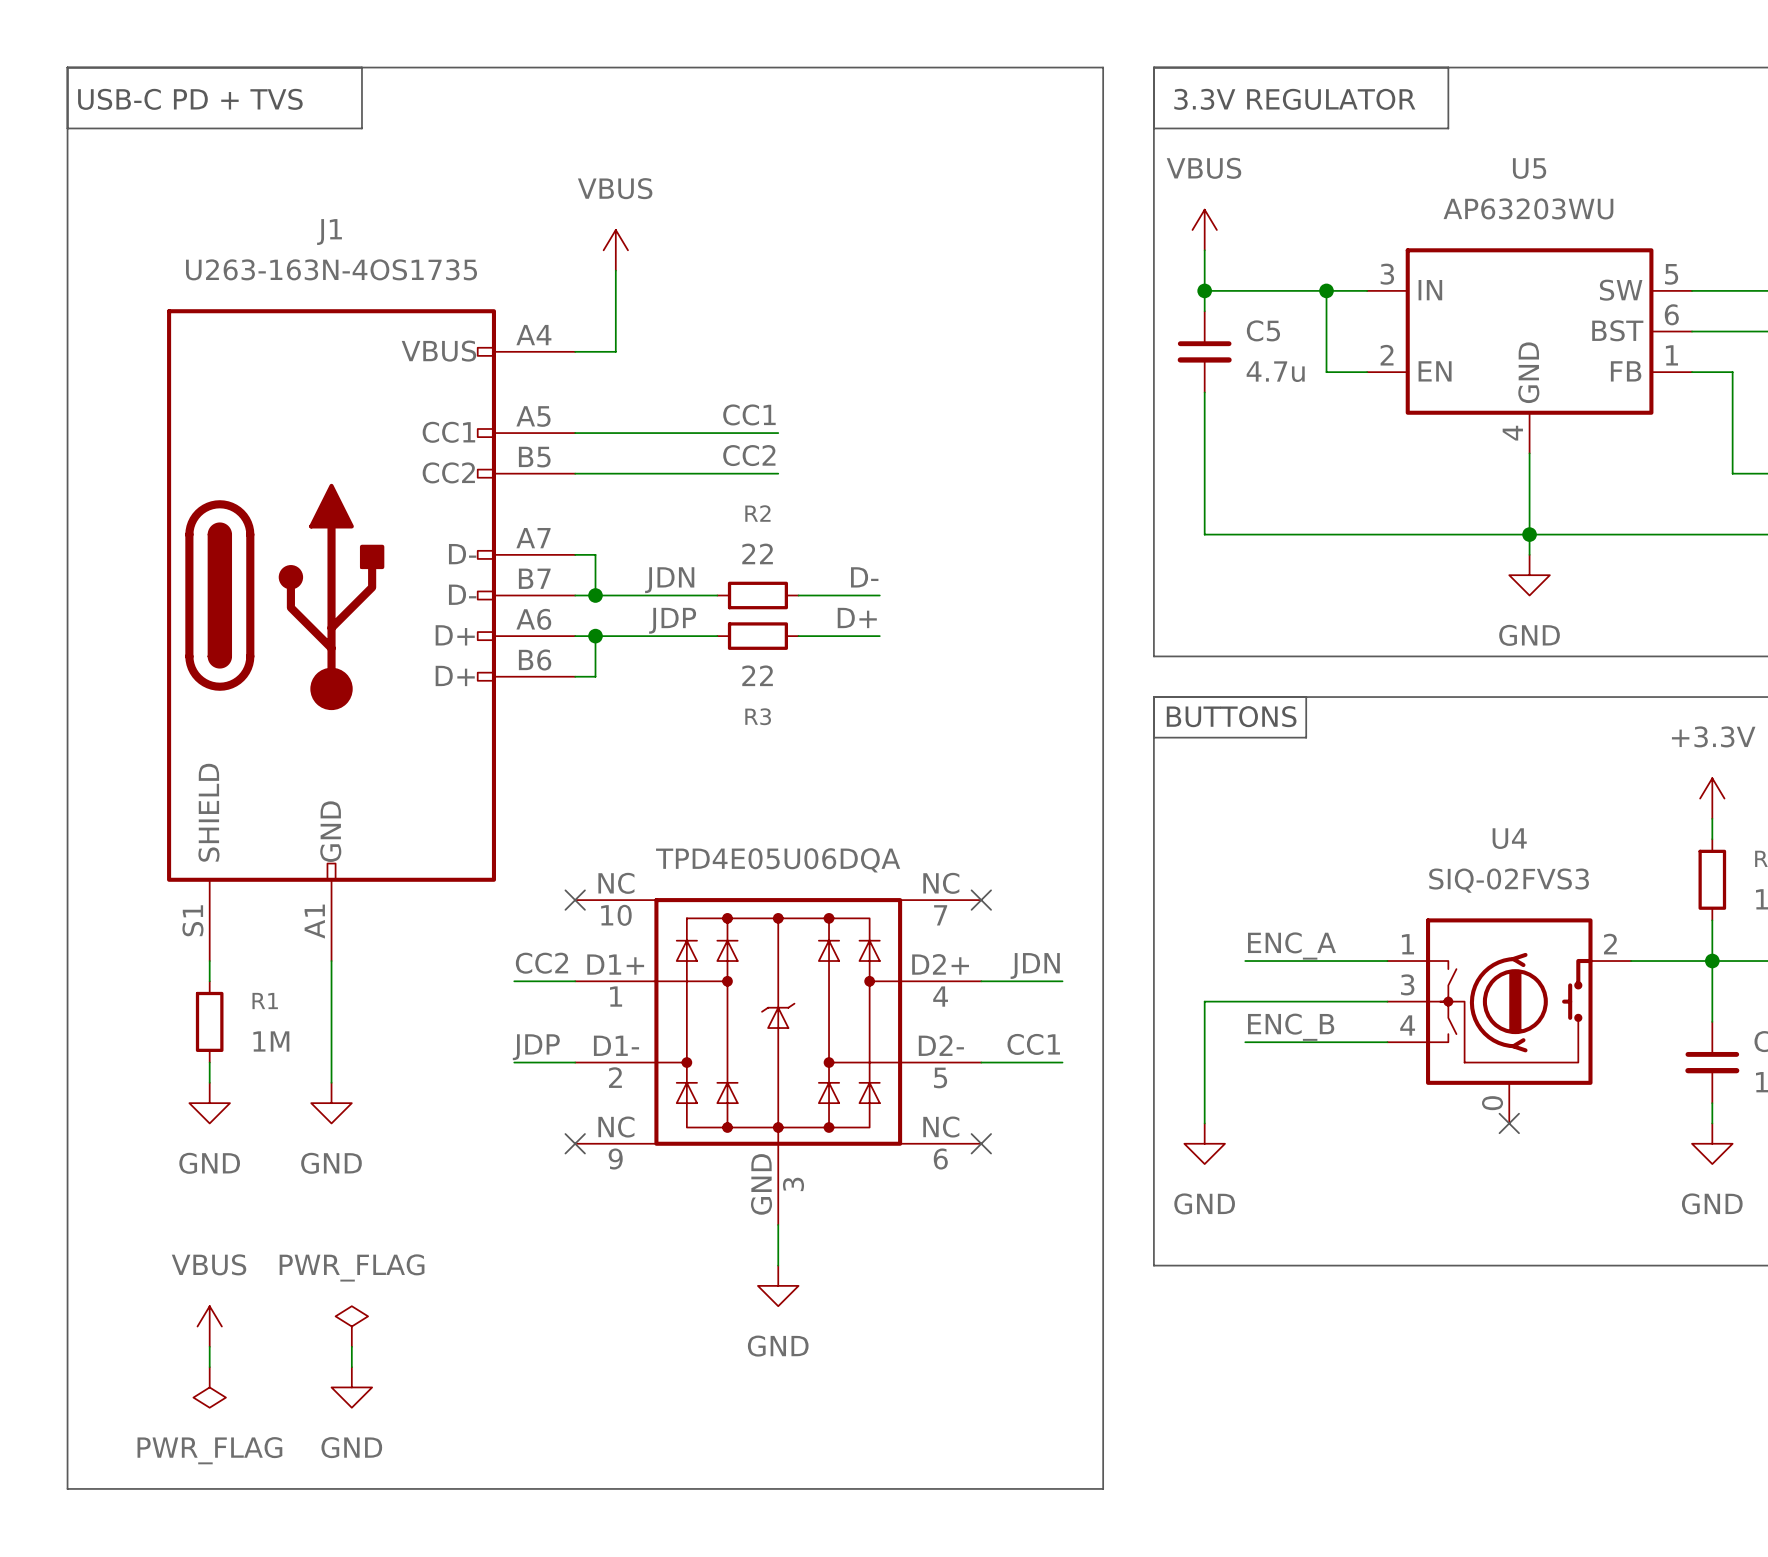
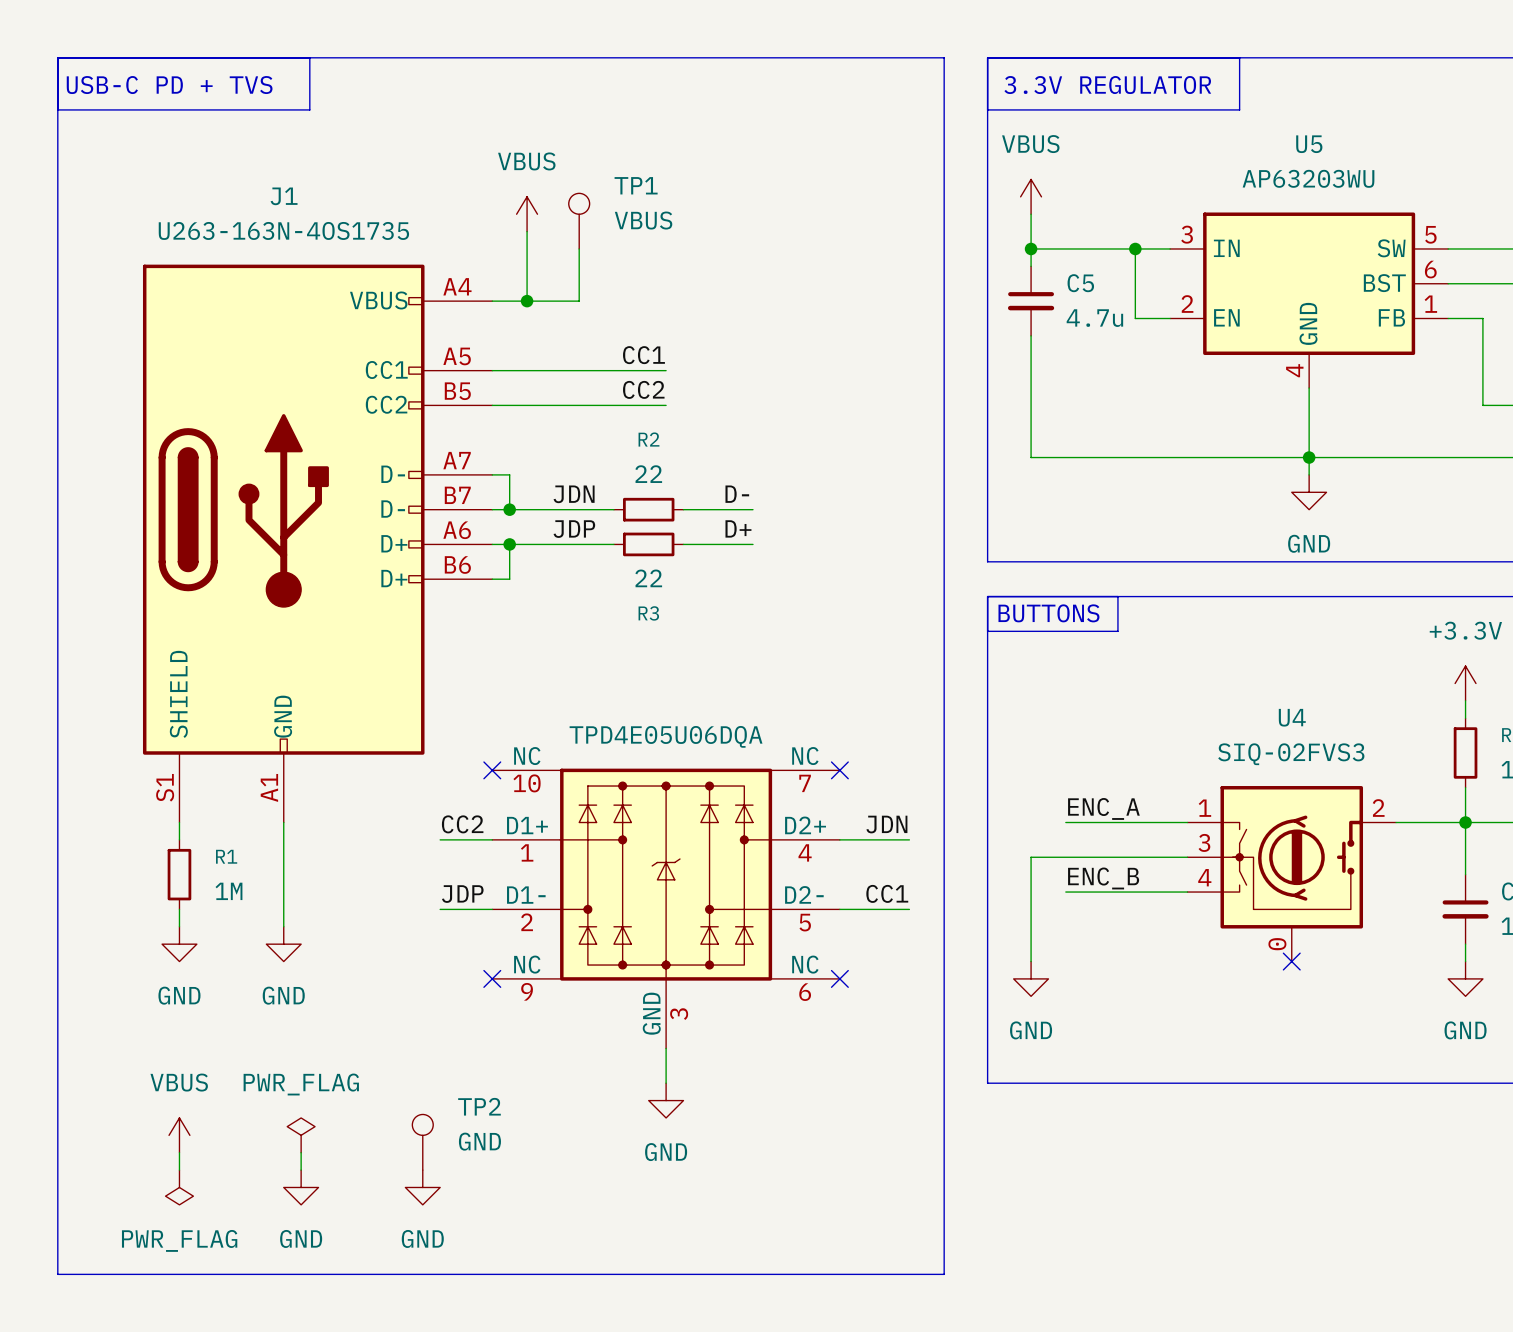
TP1: none -> VBUS (579, 221)
wire: none -> (579, 248) (579, 301) (527, 301)
junction: none -> (527, 301)
TP2: none -> GND (422, 1142)
power symbol: none -> GND (422, 1187)

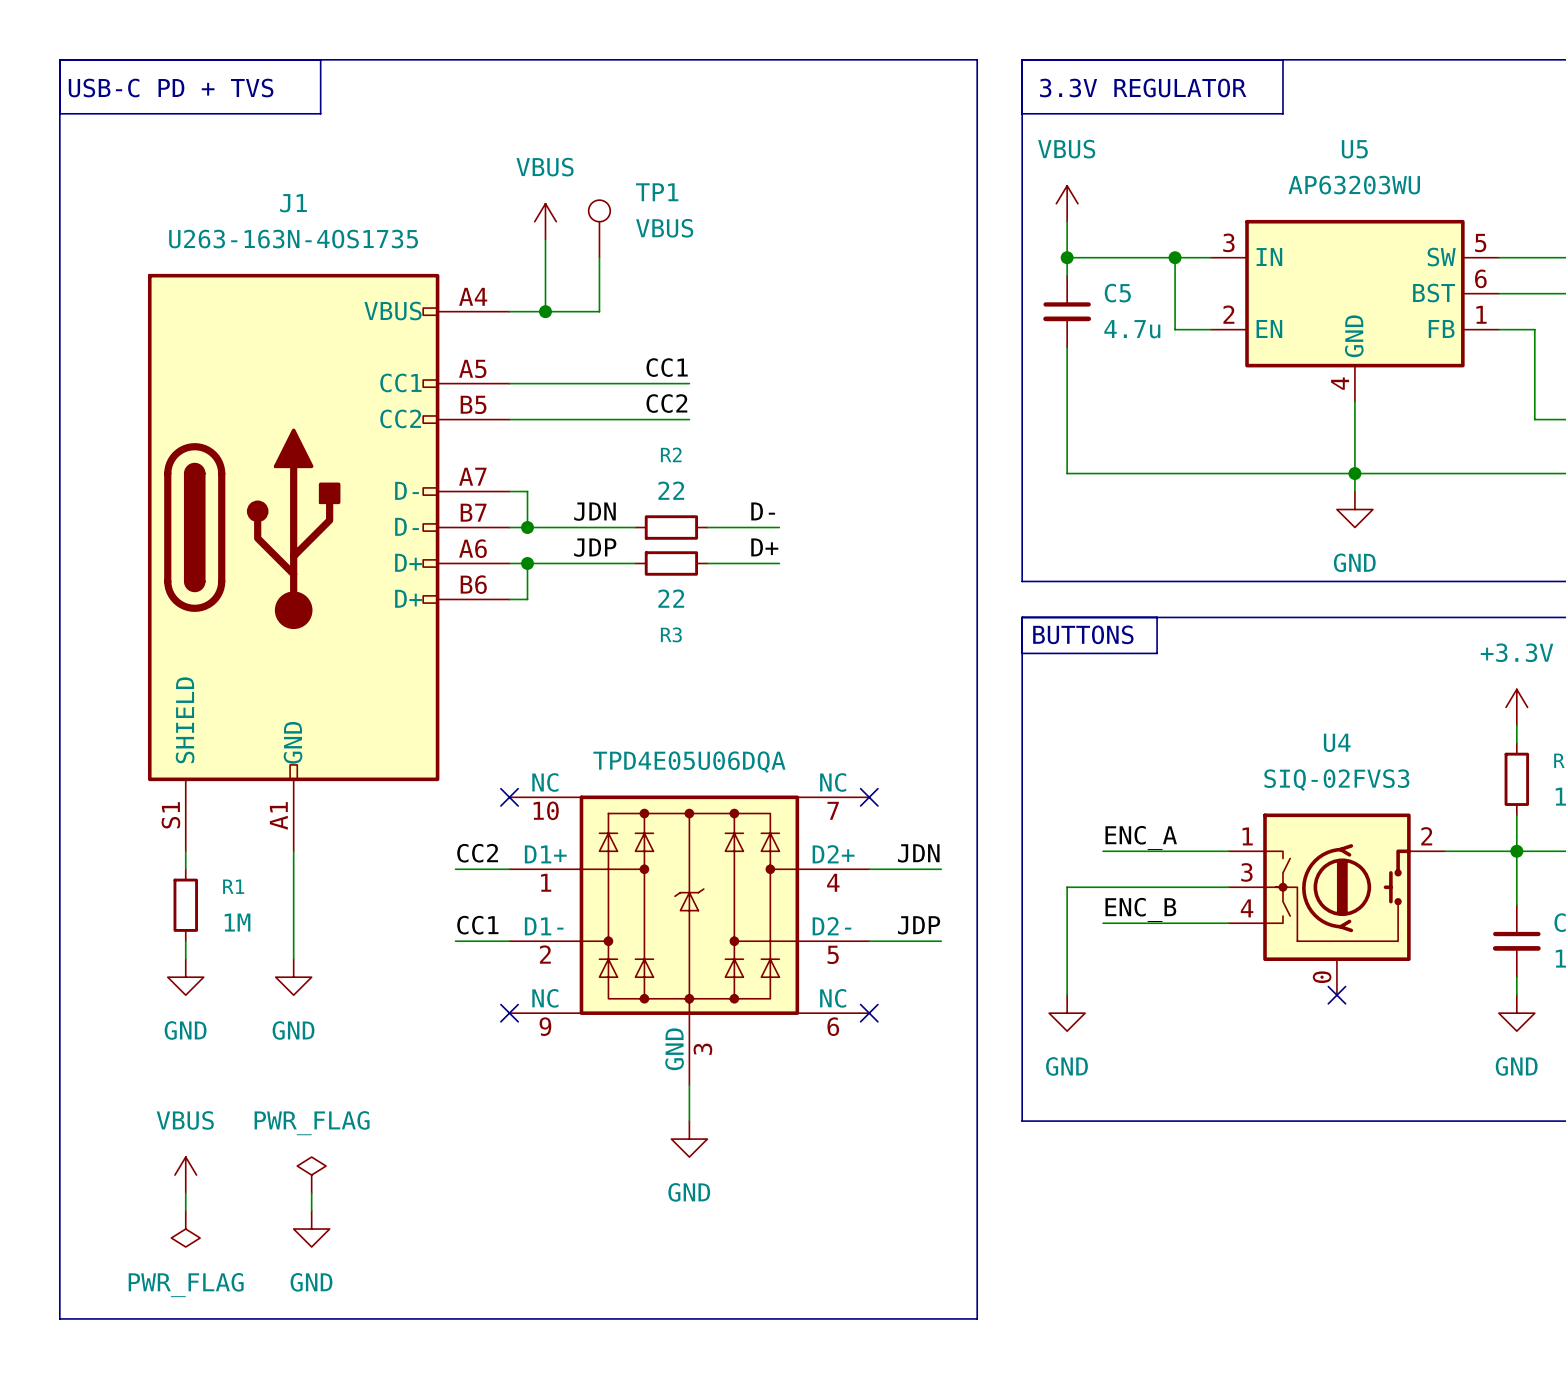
label: CC1 (887, 893) -> JDP (919, 925)
label: JDP (462, 894) -> CC1 (477, 925)
TP2: GND (422, 1142) -> none
power symbol: GND (422, 1187) -> none

